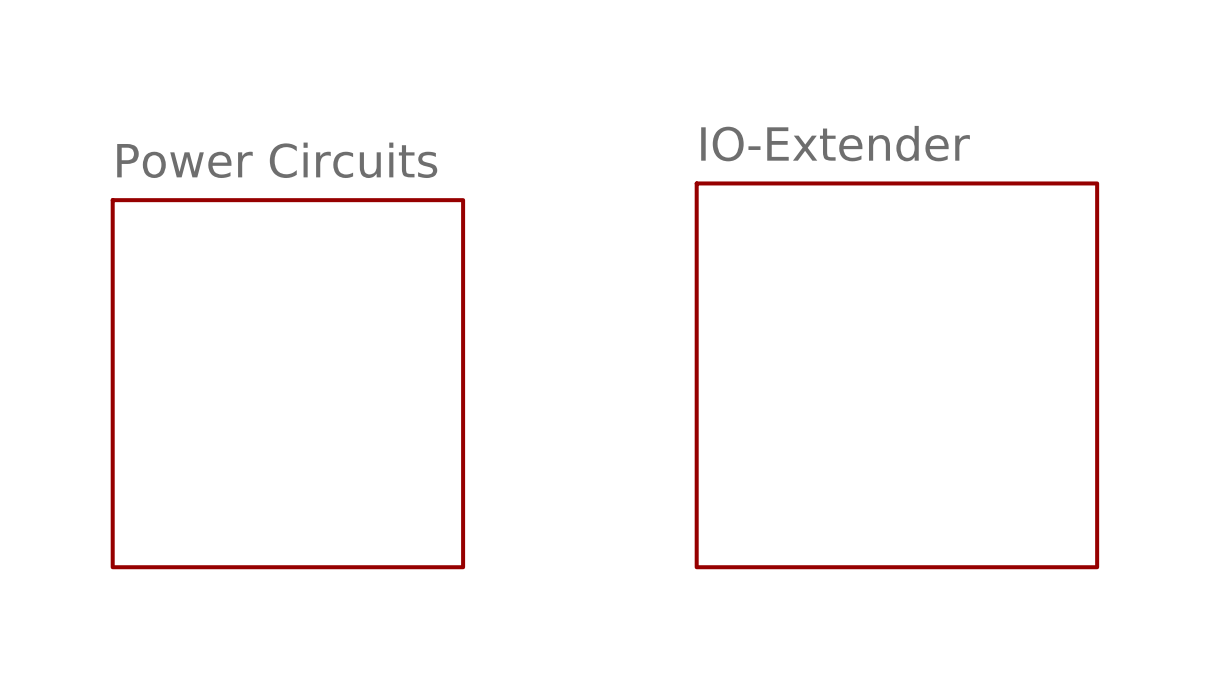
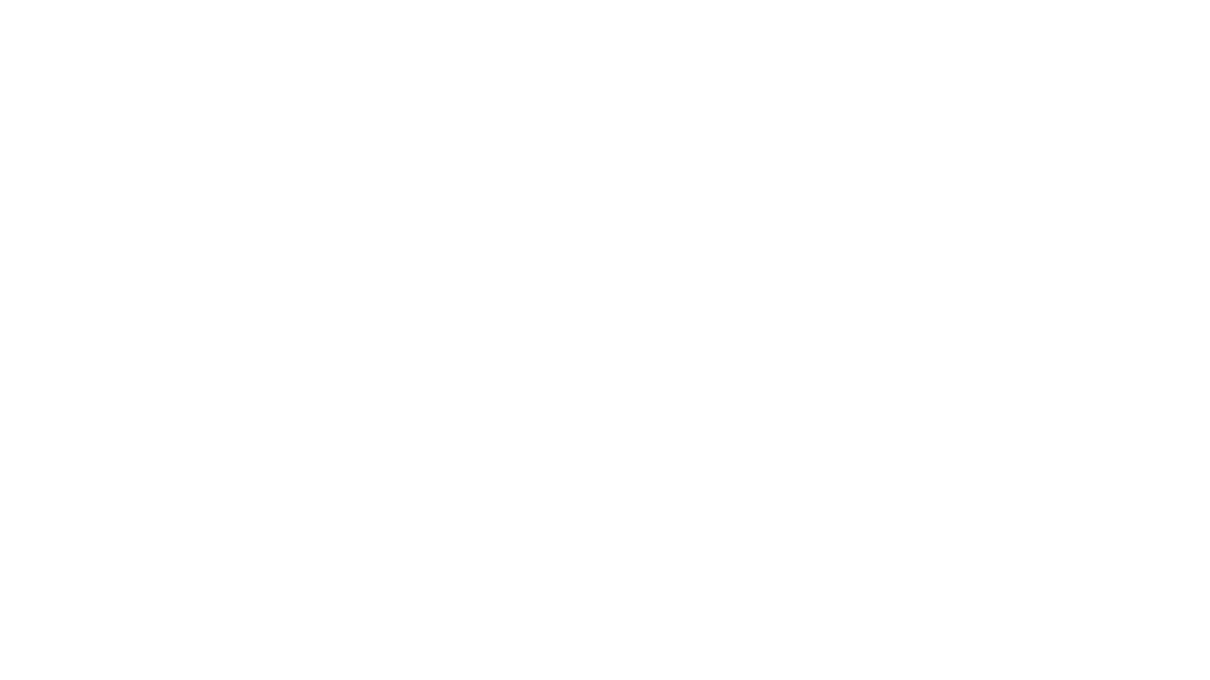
sheet IO-Extender: (896, 375) -> none
sheet Power Circuits: (287, 383) -> none

